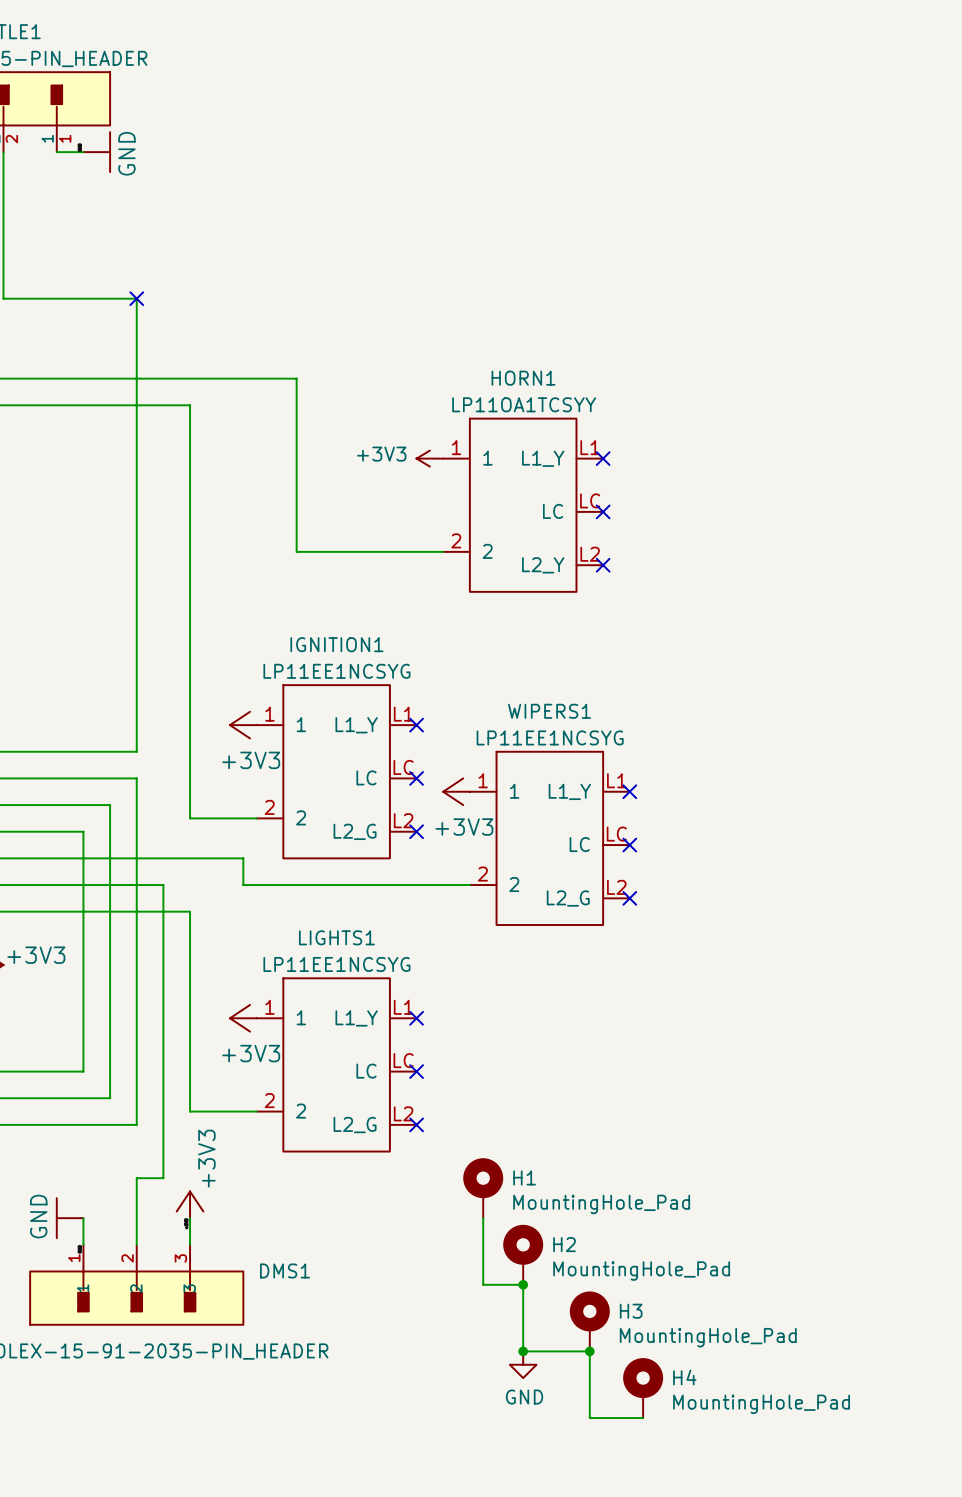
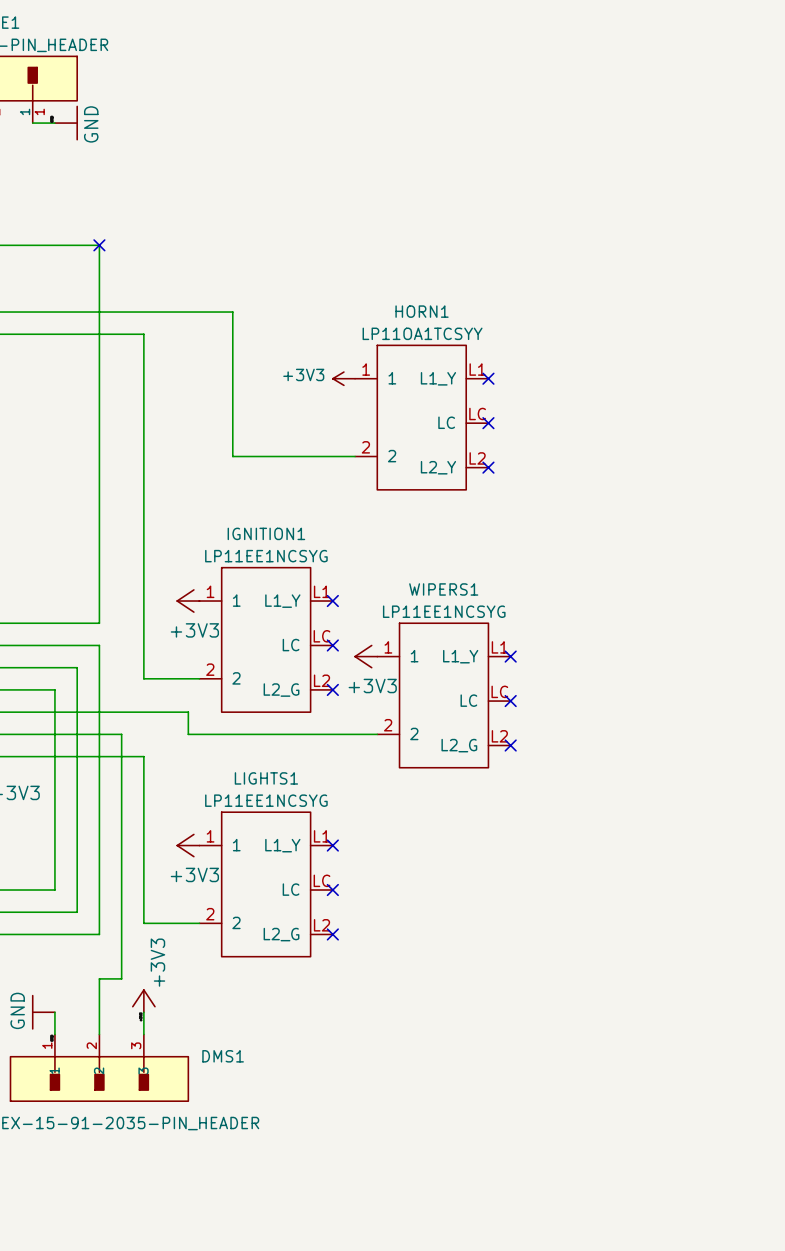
H1: MountingHole_Pad (483, 1188) -> none
wire: (483, 1218) (483, 1284) (523, 1284) (523, 1351) (589, 1351) (589, 1418) (643, 1418) -> none
H2: MountingHole_Pad (523, 1254) -> none
junction: (523, 1284) -> none
H3: MountingHole_Pad (589, 1321) -> none
junction: (523, 1351) -> none
junction: (589, 1351) -> none
power symbol: GND (523, 1364) -> none
H4: MountingHole_Pad (643, 1388) -> none

